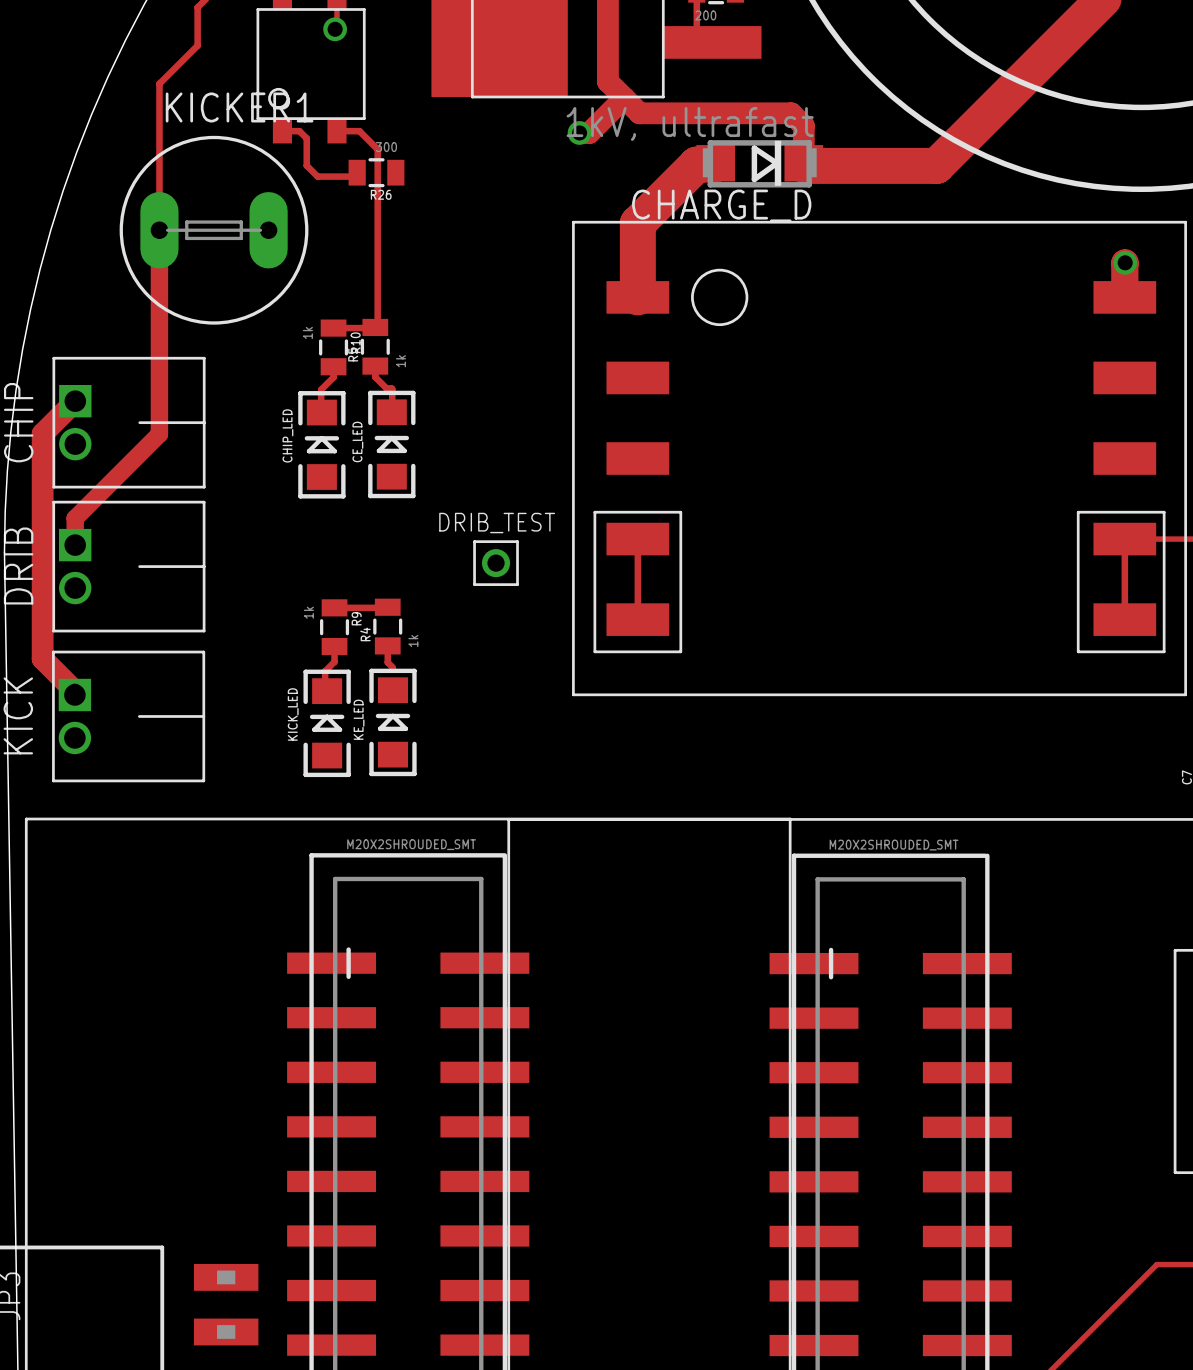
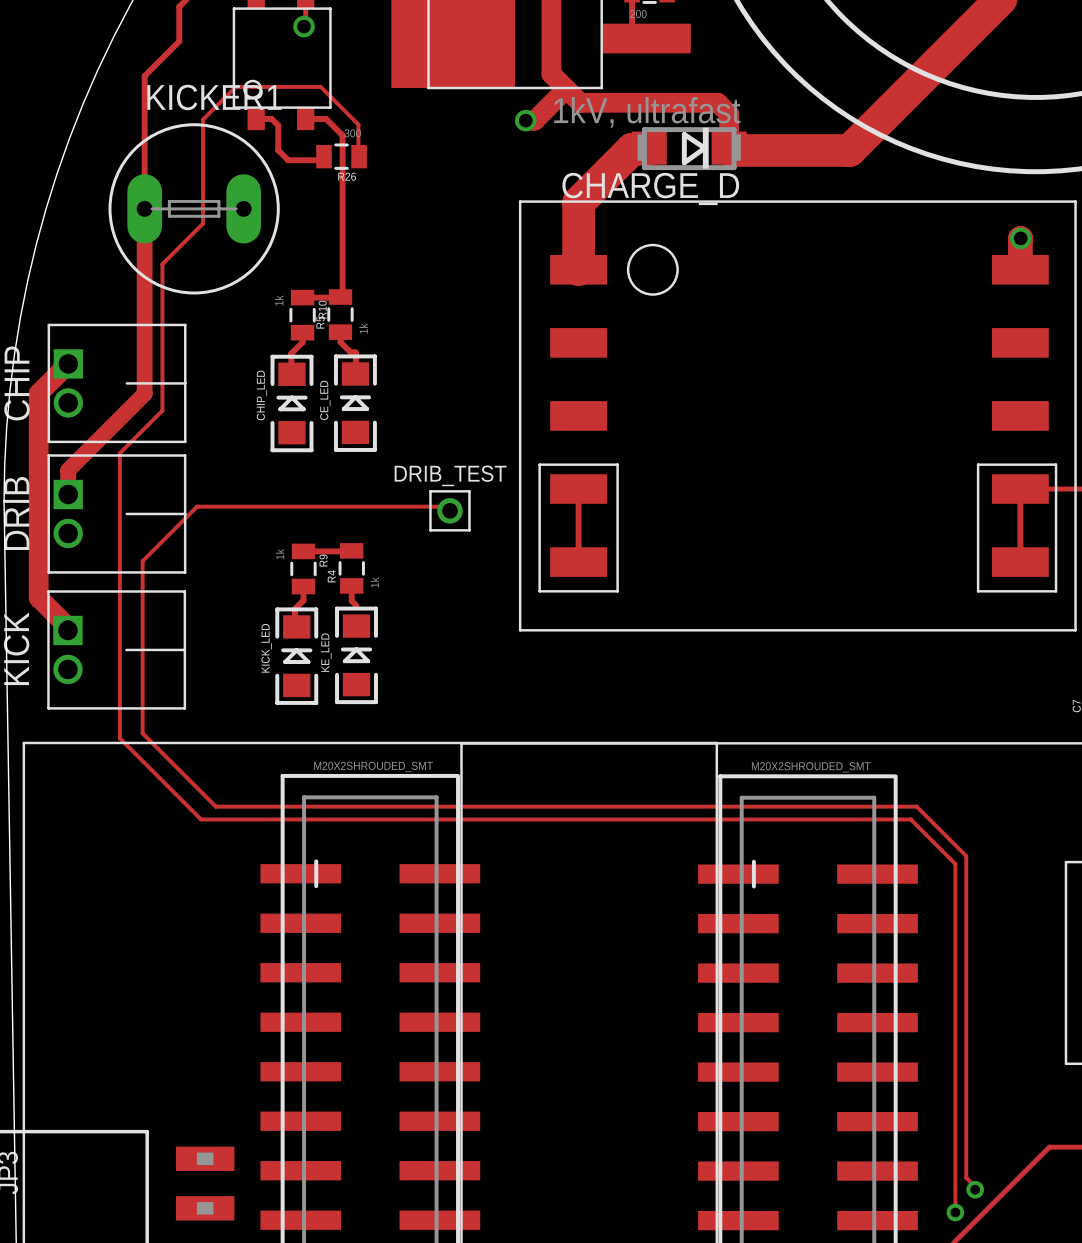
track: none -> (359, 156) (358, 124) (320, 86) (235, 86) (203, 119) (203, 223) (162, 264) (162, 410) (119, 453) (119, 738) (201, 819) (910, 819) (955, 864) (955, 1212)
track: none -> (449, 510) (445, 506) (197, 506) (142, 561) (142, 733) (215, 806) (916, 806) (966, 856) (966, 1177) (975, 1186) (975, 1189)
via: none -> (975, 1189)
via: none -> (955, 1212)

